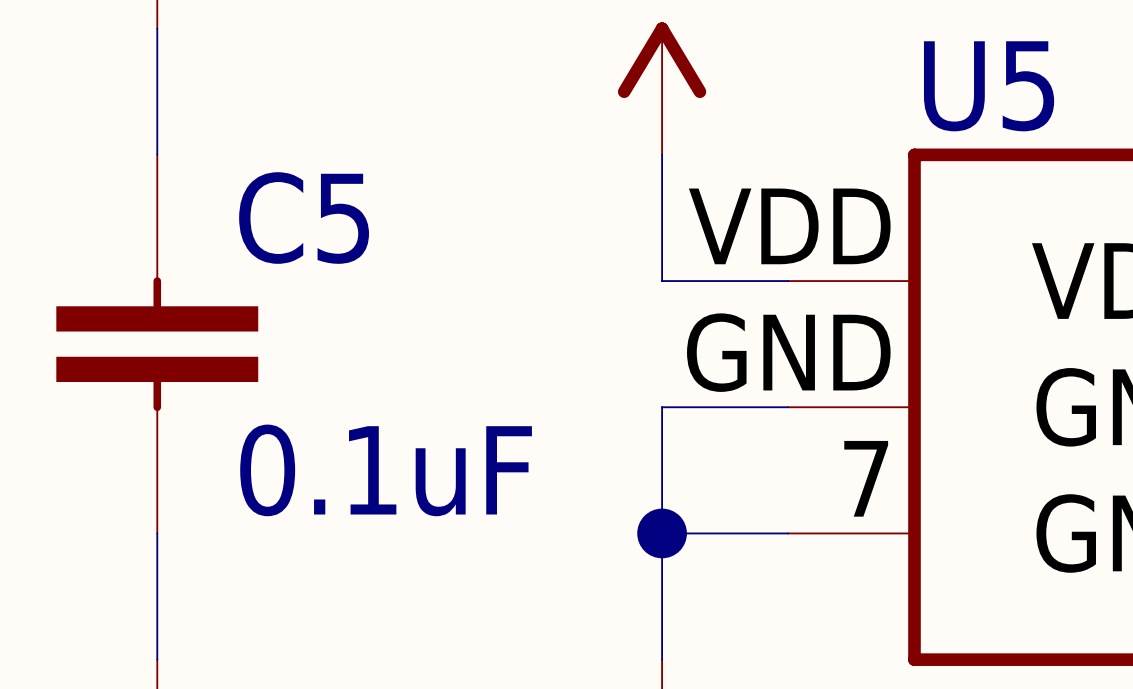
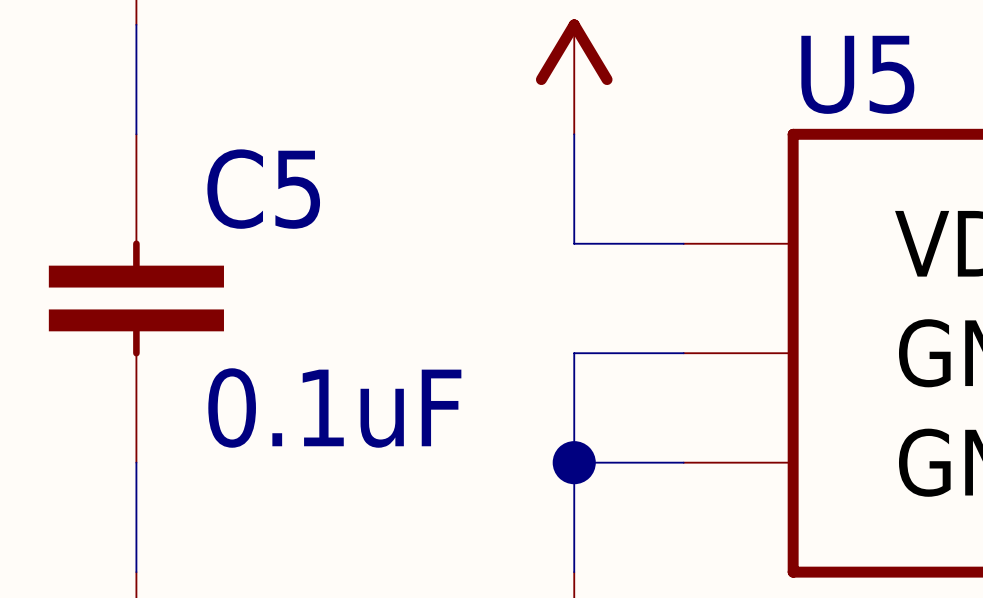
U5 pin number: VDD (789, 226) -> none
U5 pin number: GND (788, 352) -> none
U5 pin number: 7 (866, 478) -> none

